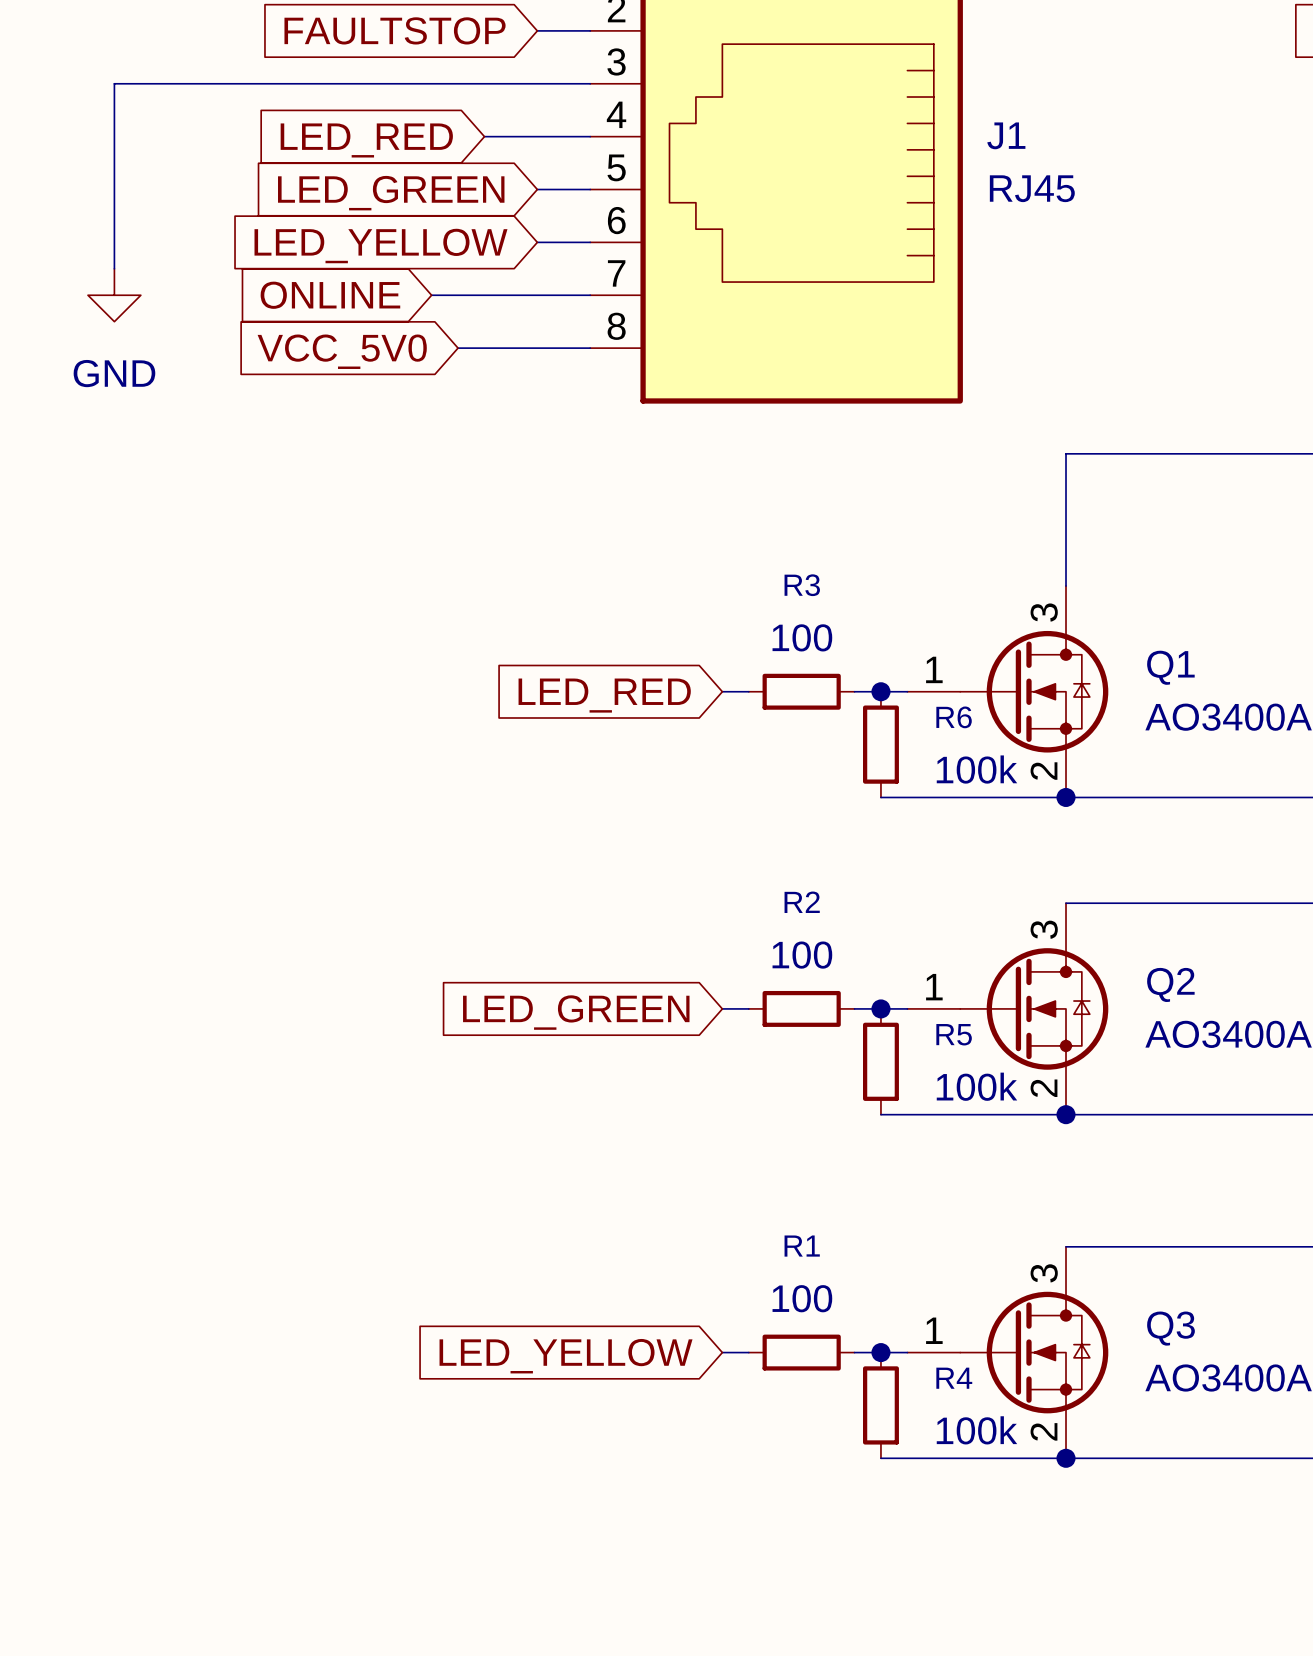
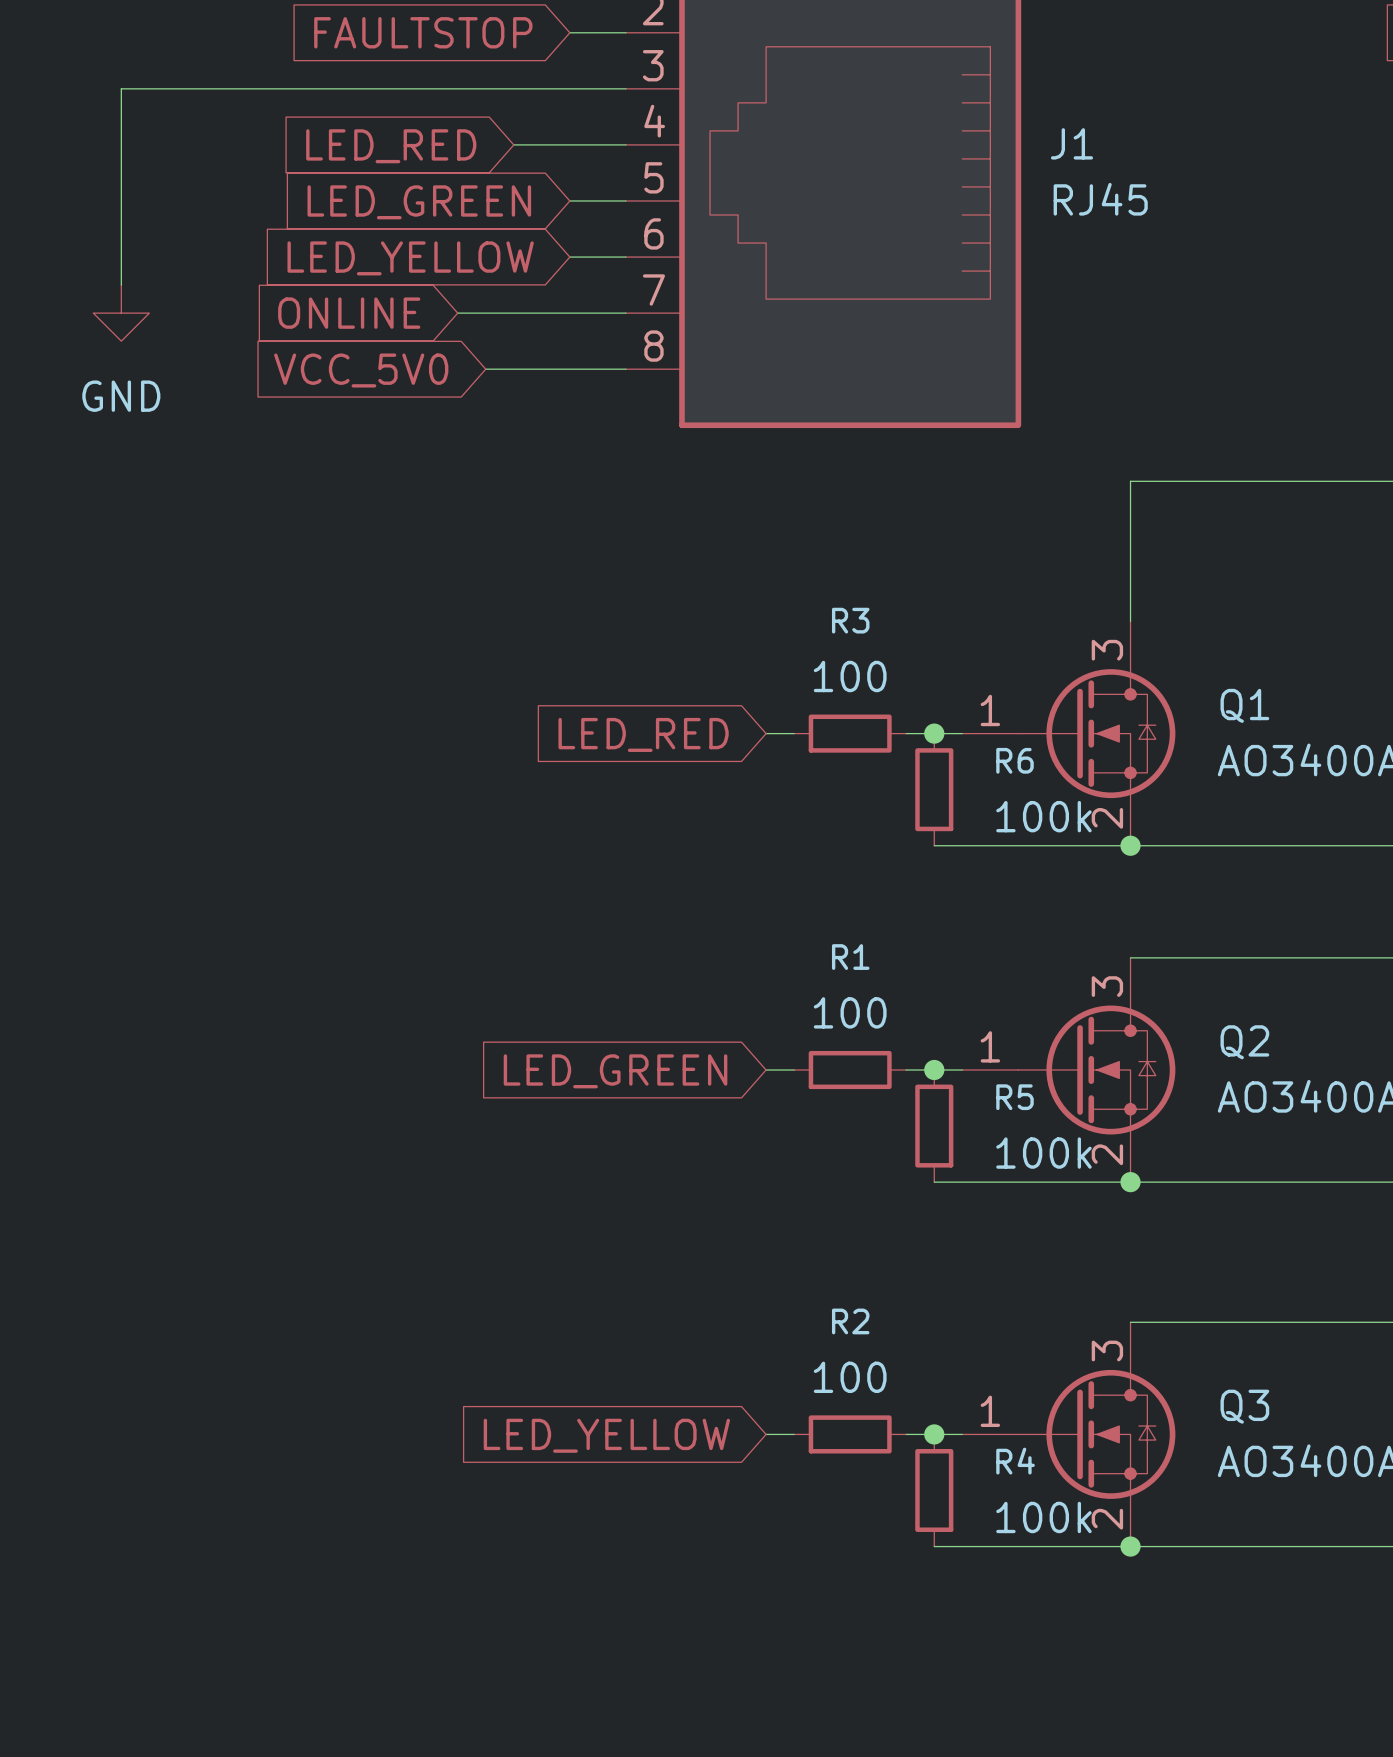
R2 name: R2 (802, 902) -> R1 (850, 957)
R1 name: R1 (802, 1246) -> R2 (850, 1321)

